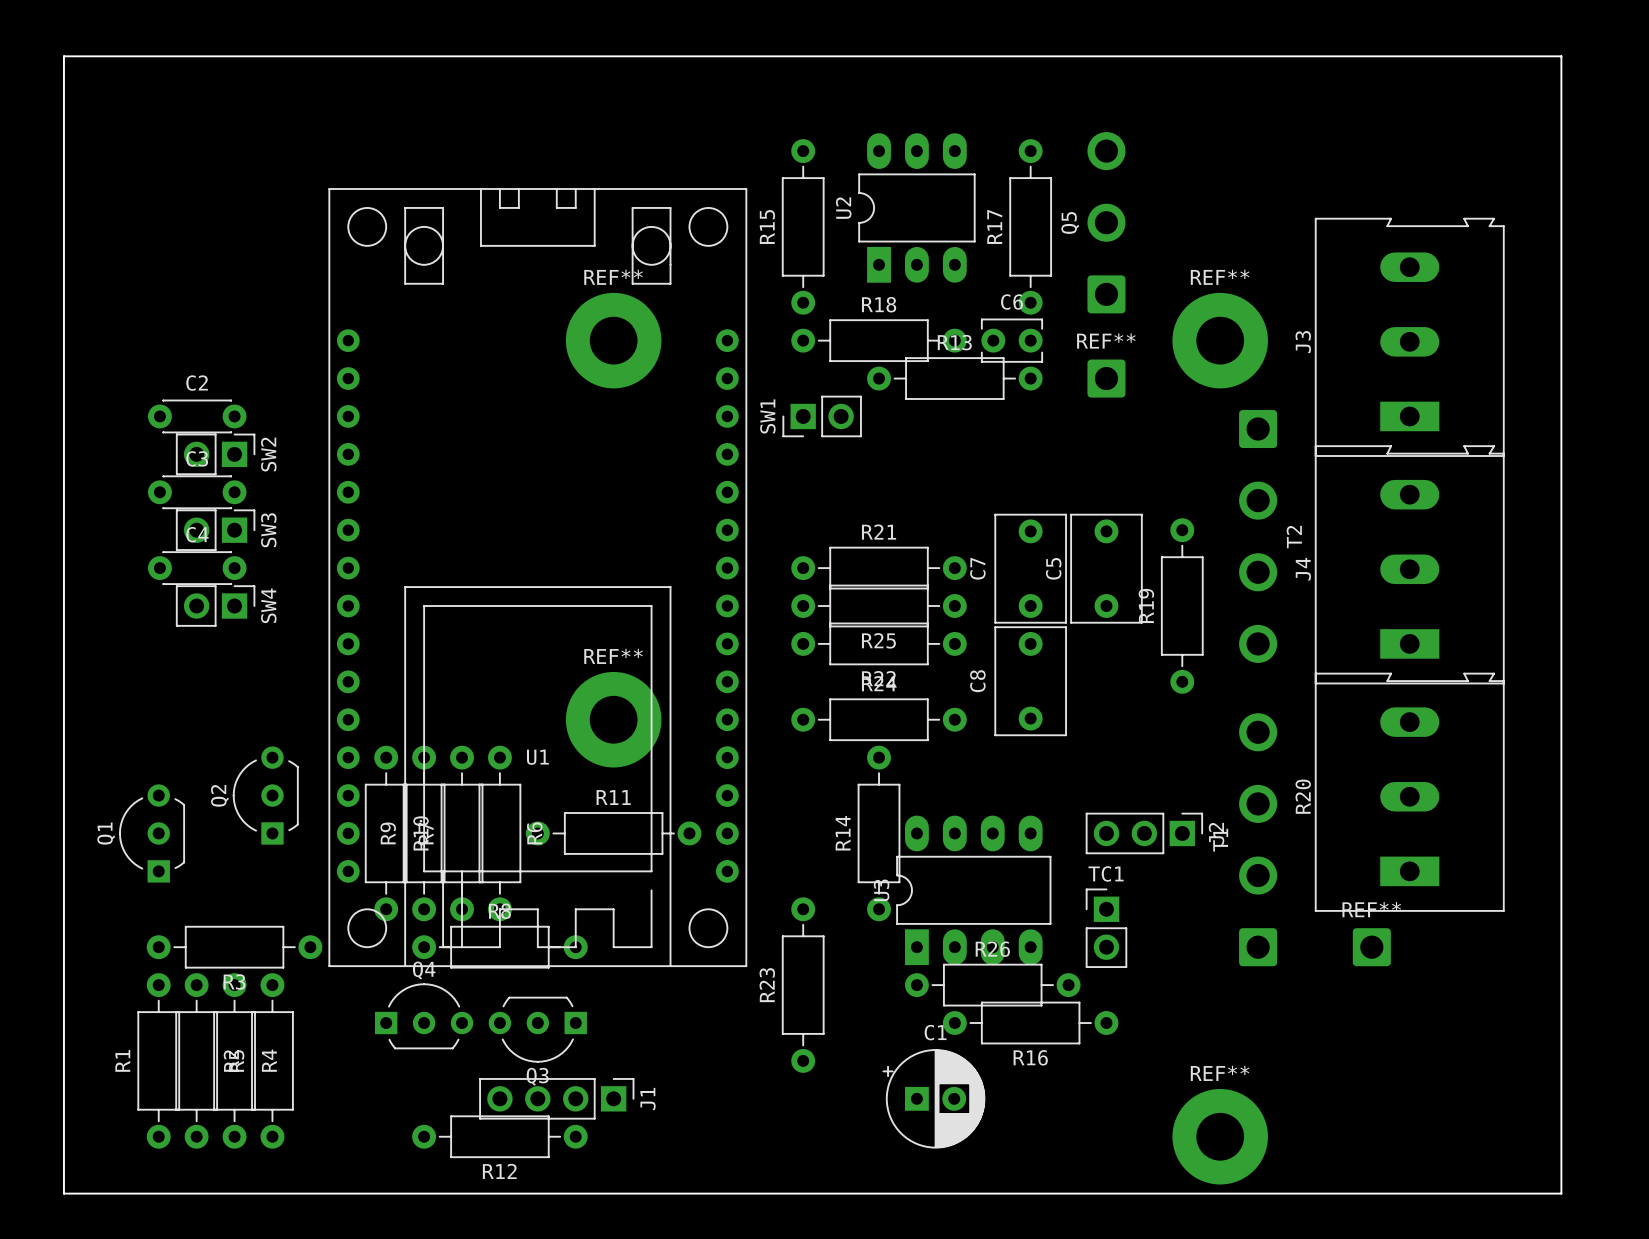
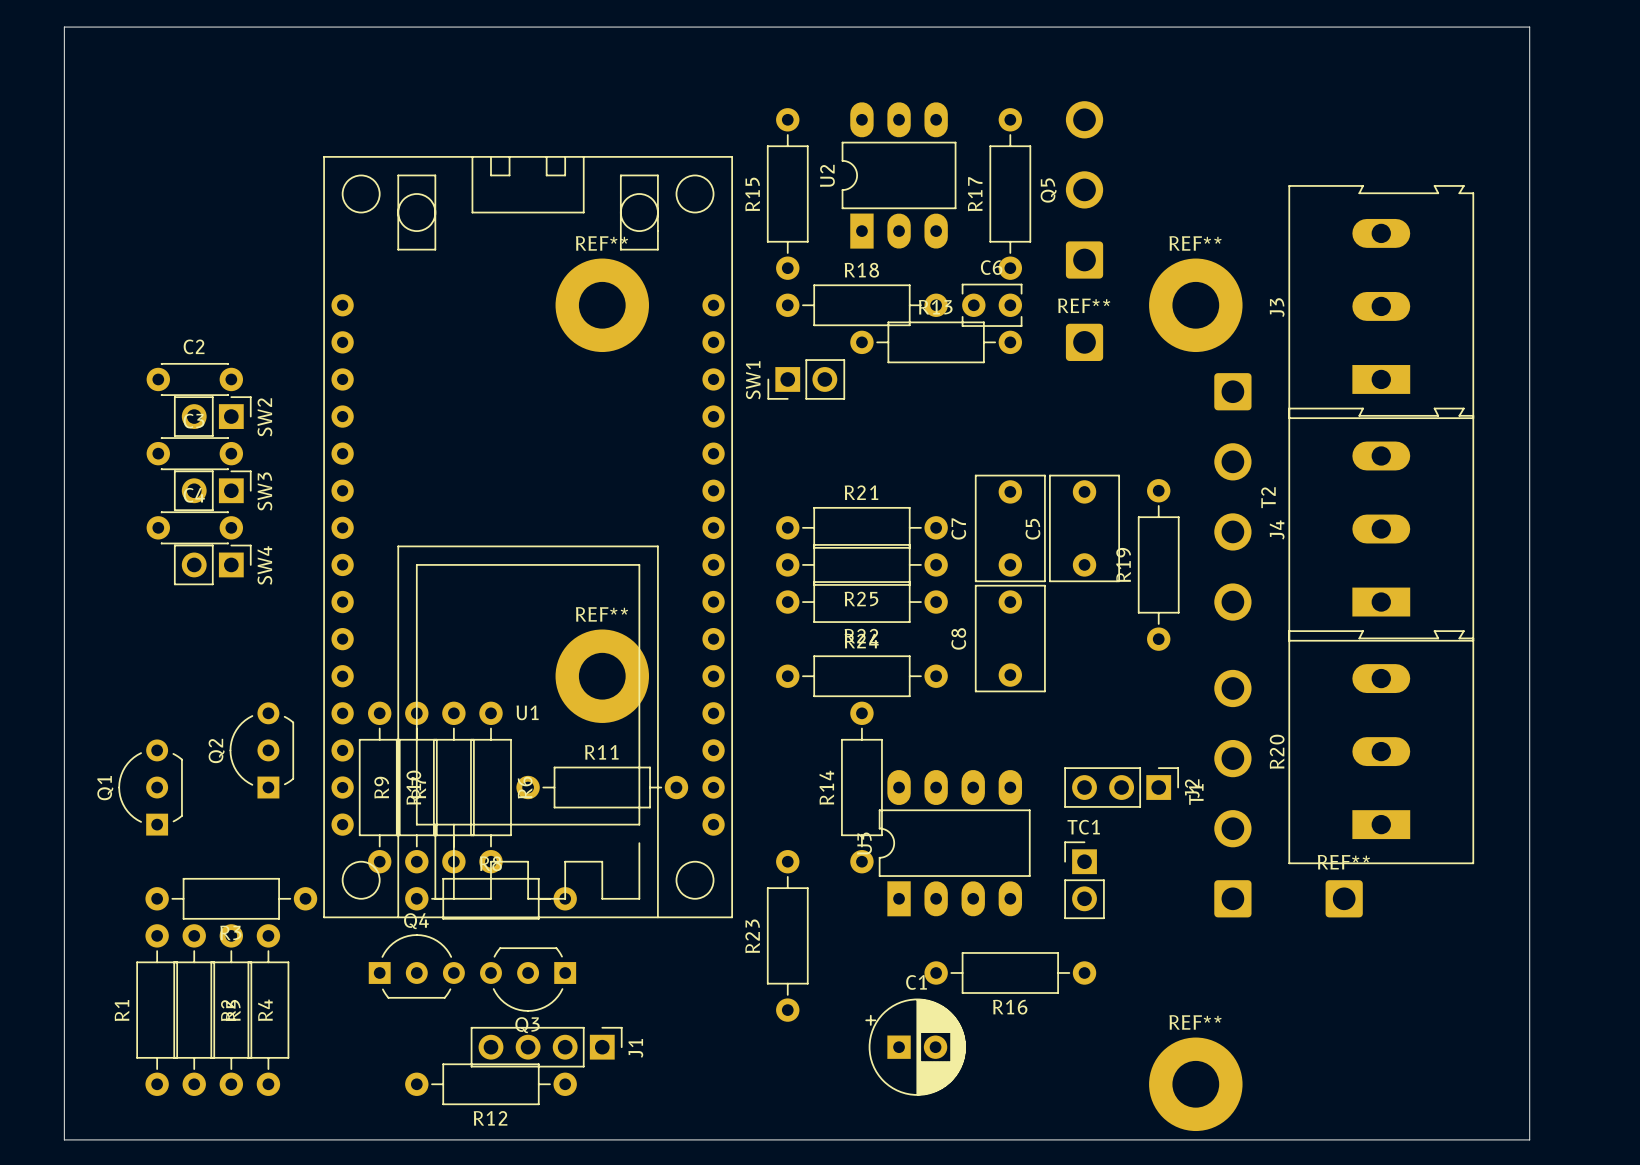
R26: (992, 985) -> none

